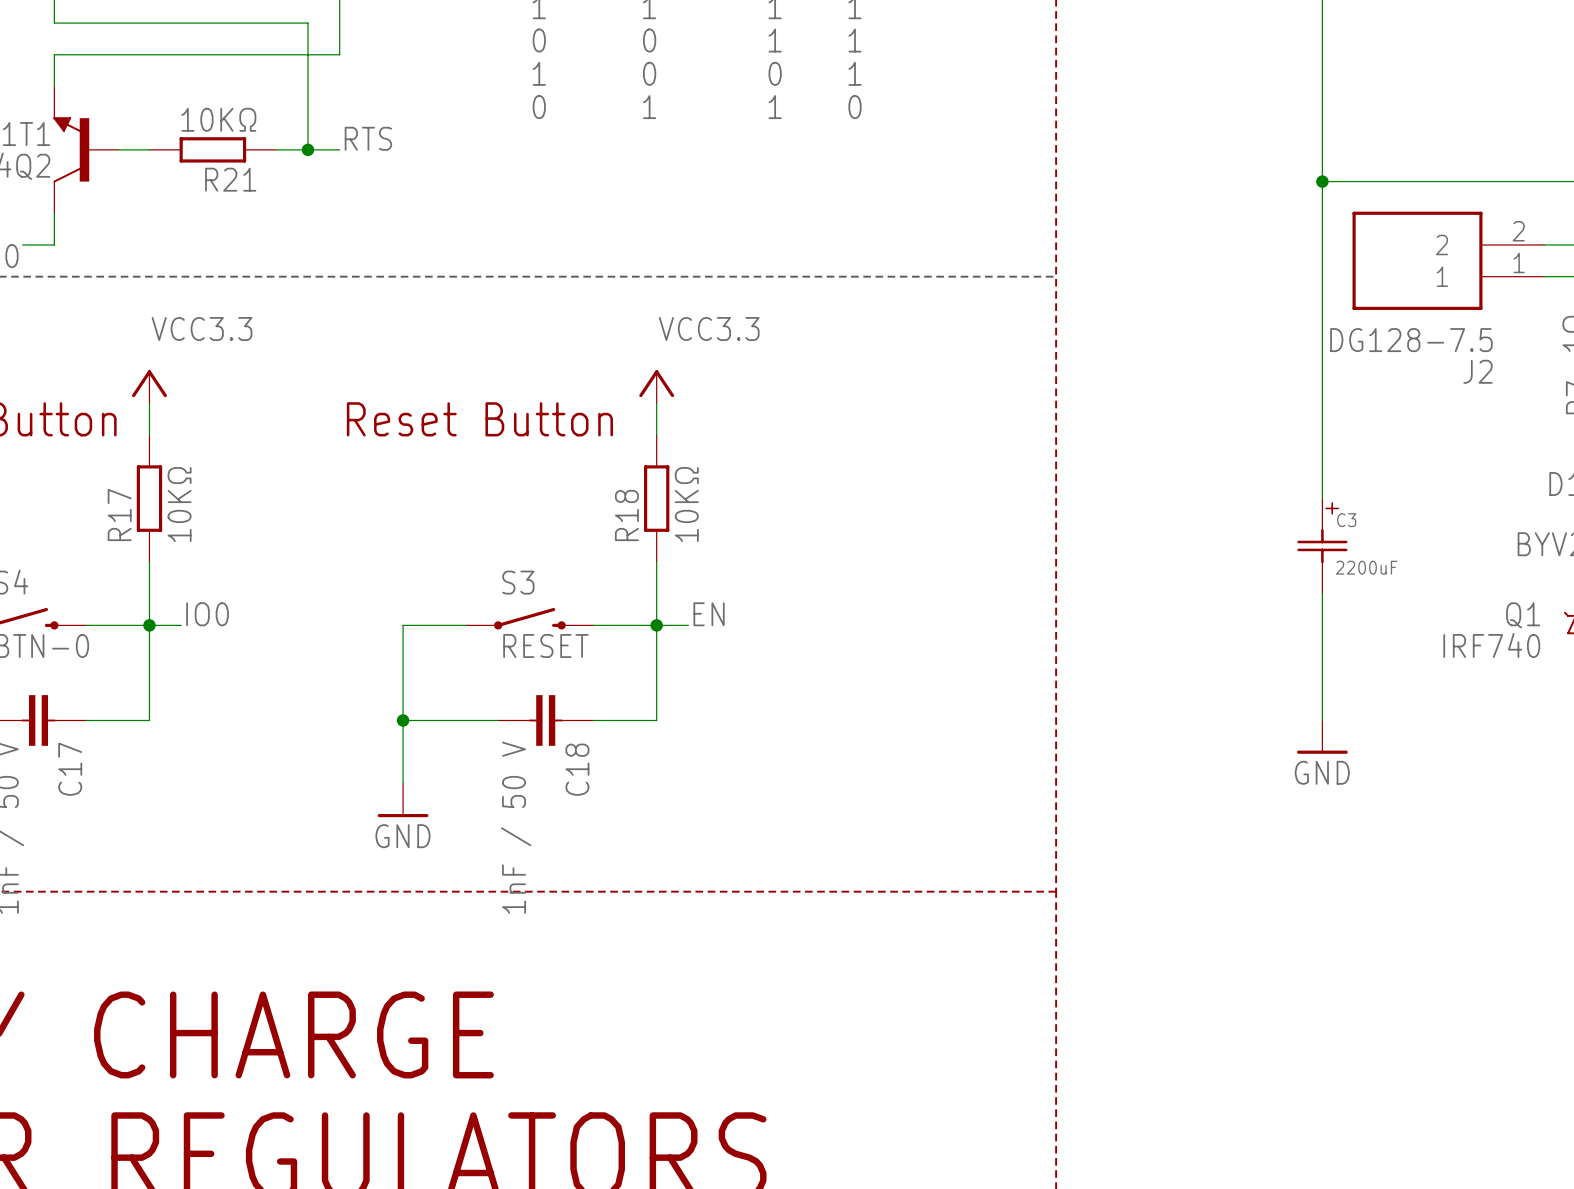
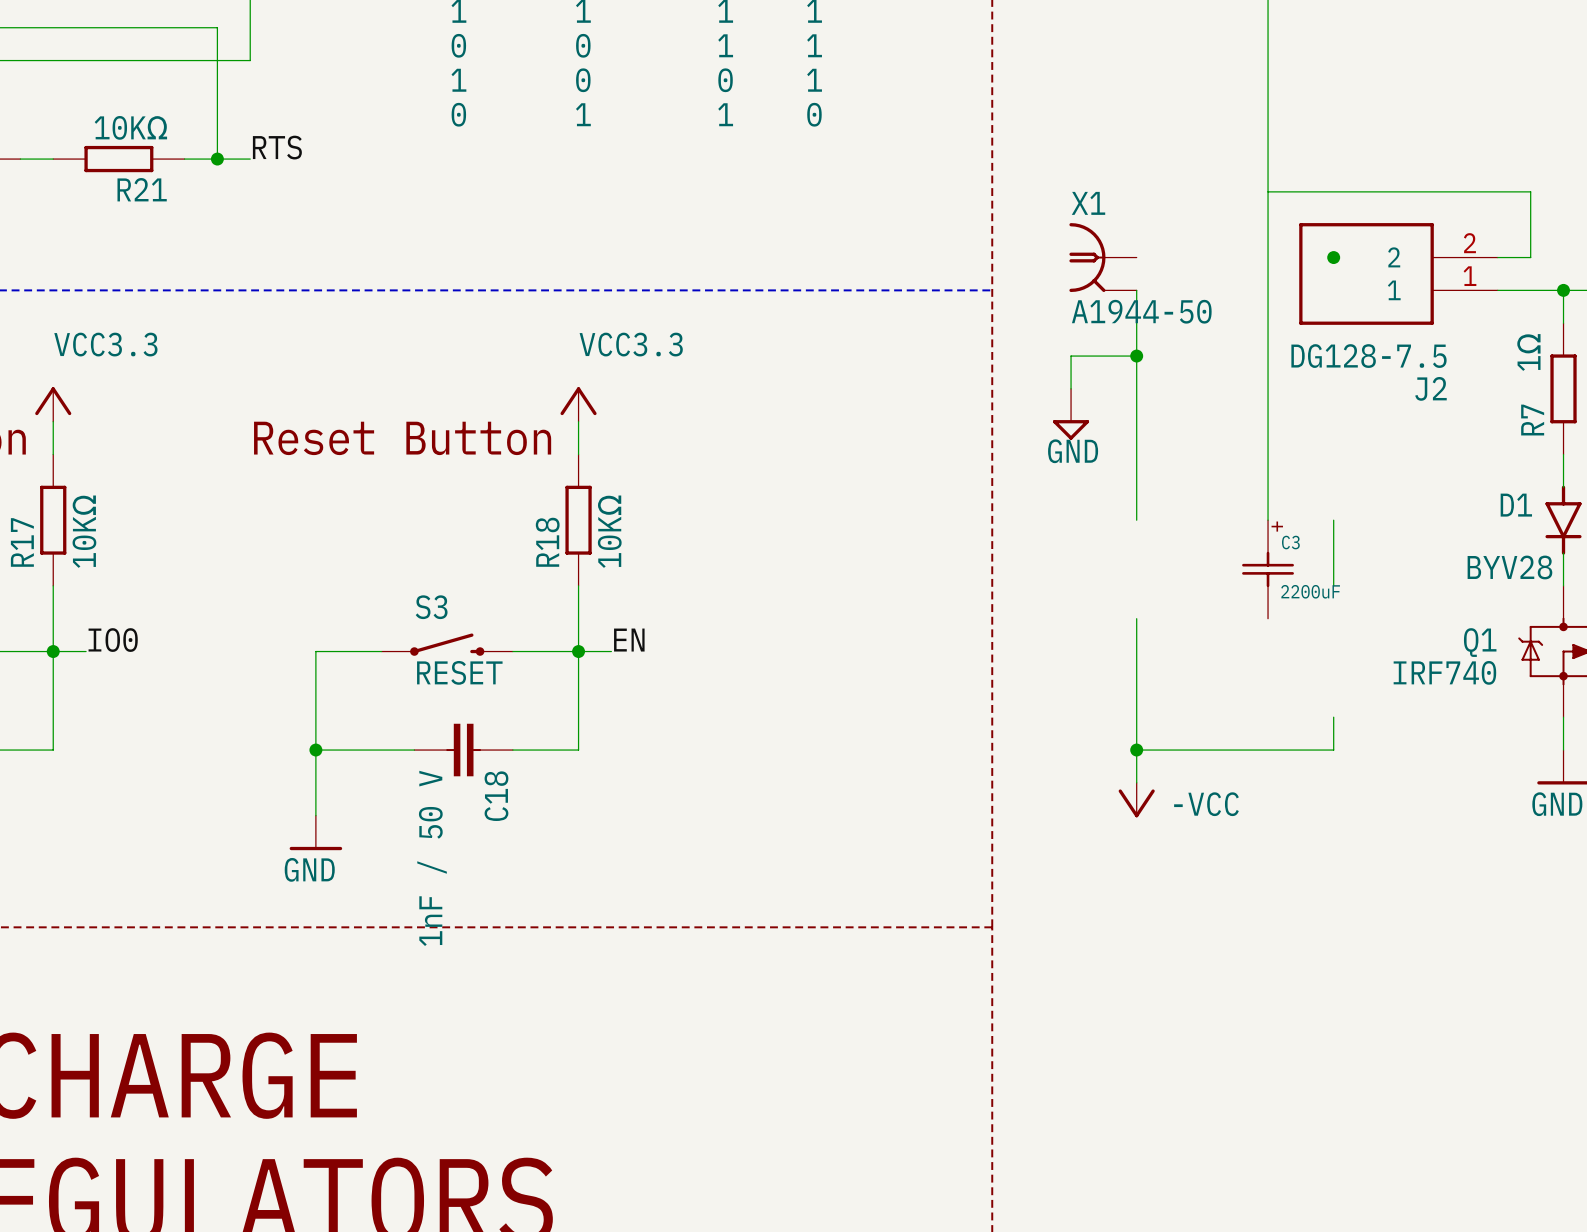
junction: (1322, 181) -> none
X1: none -> A1944-50 (1103, 257)
junction: none -> (1333, 257)
wire: none -> (1136, 290) (1136, 520)
wire: none -> (1136, 356) (1071, 356) (1071, 388)
junction: none -> (1136, 356)
power symbol: none -> GND (1071, 414)
wire: none -> (1333, 520) (1333, 585)
wire: none -> (1136, 618) (1136, 782)
wire: (1322, 593) (1322, 720) -> none
wire: none -> (1333, 717) (1333, 750) (1136, 750)
junction: none -> (1136, 750)
power symbol: GND (1322, 737) -> none
power symbol: none -> -VCC (1136, 800)

